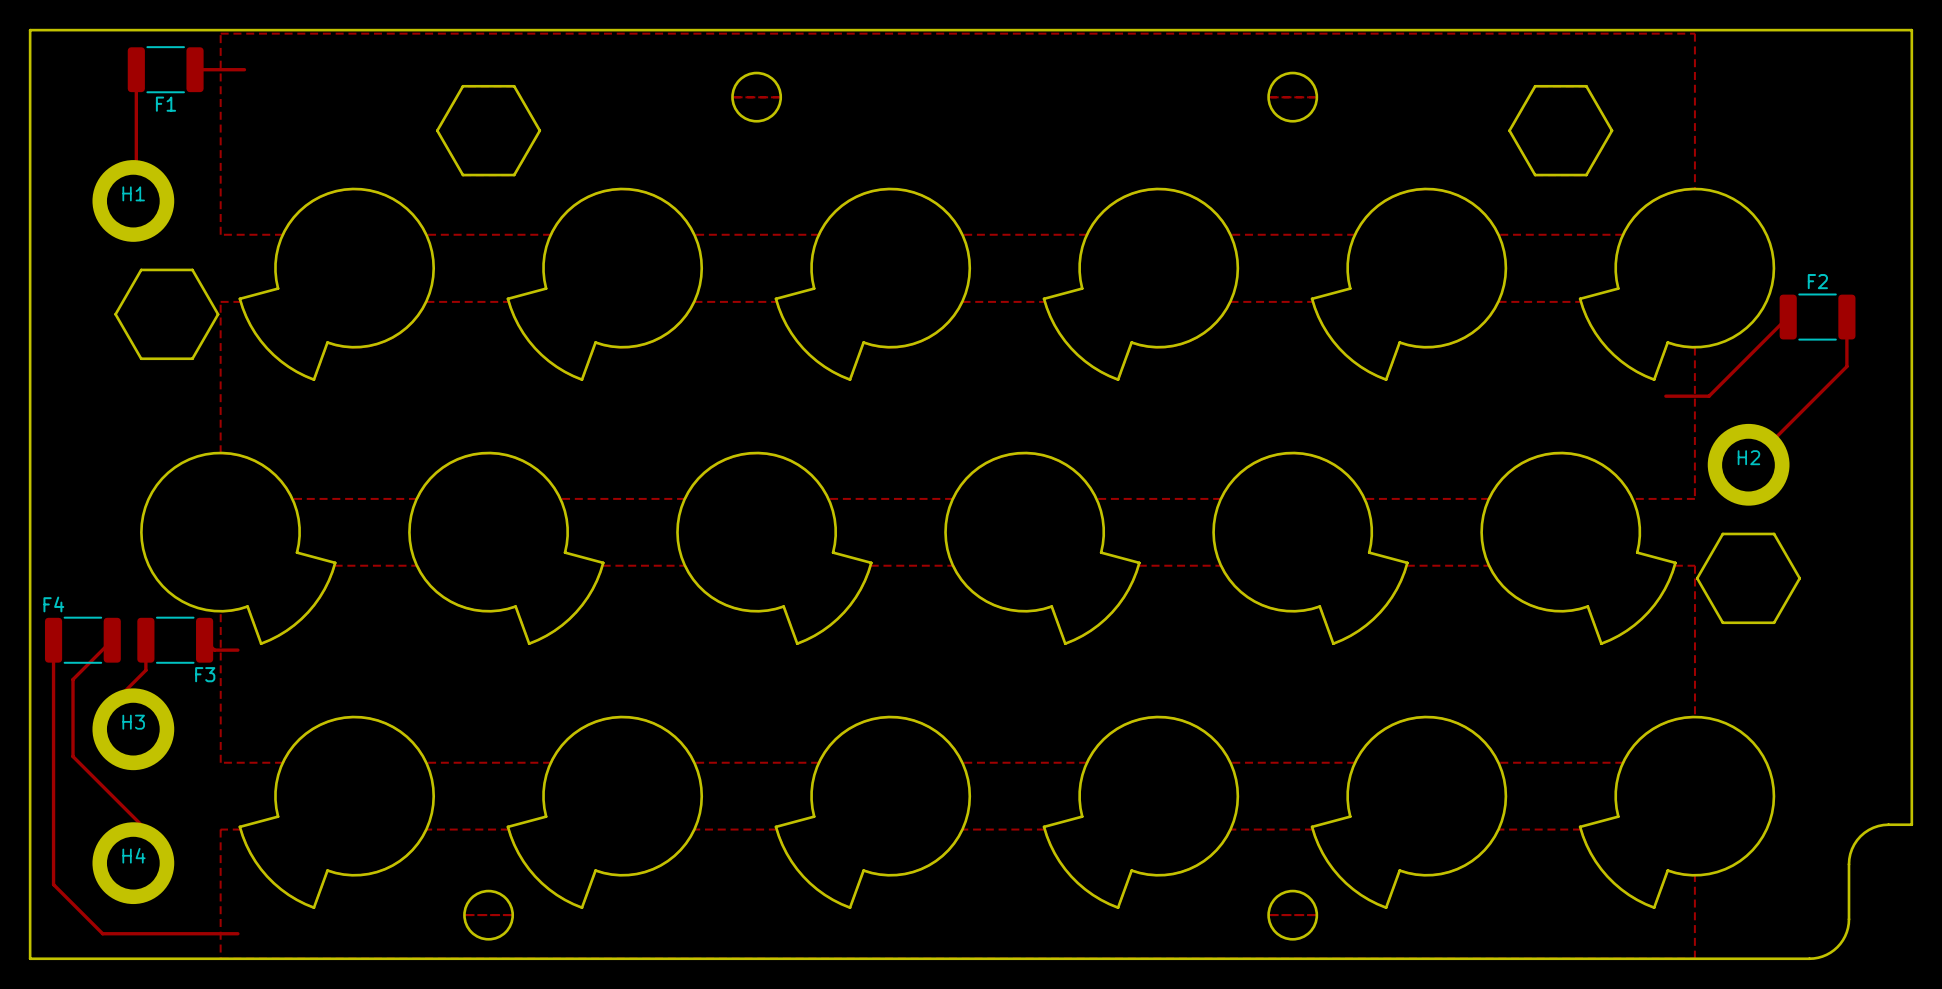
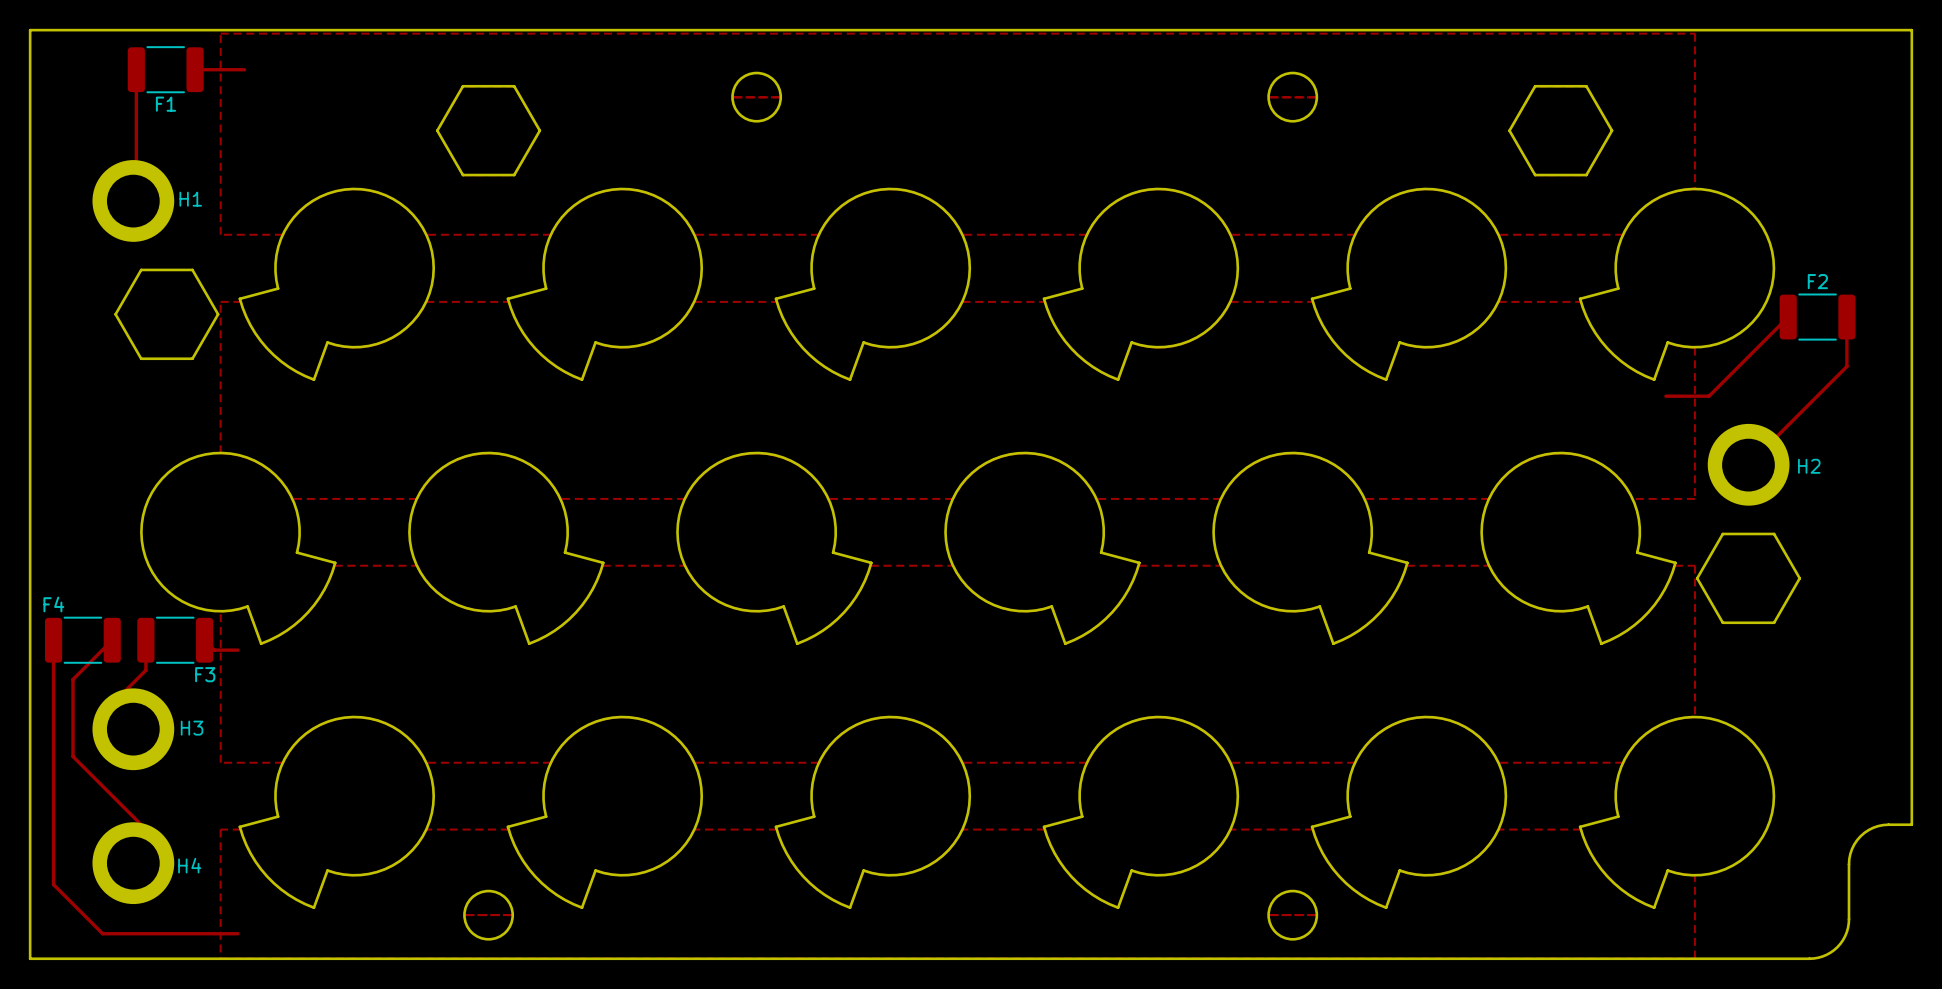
H1 name position: H1 (133, 193) -> H1 (190, 199)
H2 name position: H2 (1748, 457) -> H2 (1809, 466)
H3 name position: H3 (133, 722) -> H3 (192, 728)
H4 name position: H4 (133, 855) -> H4 (189, 865)

